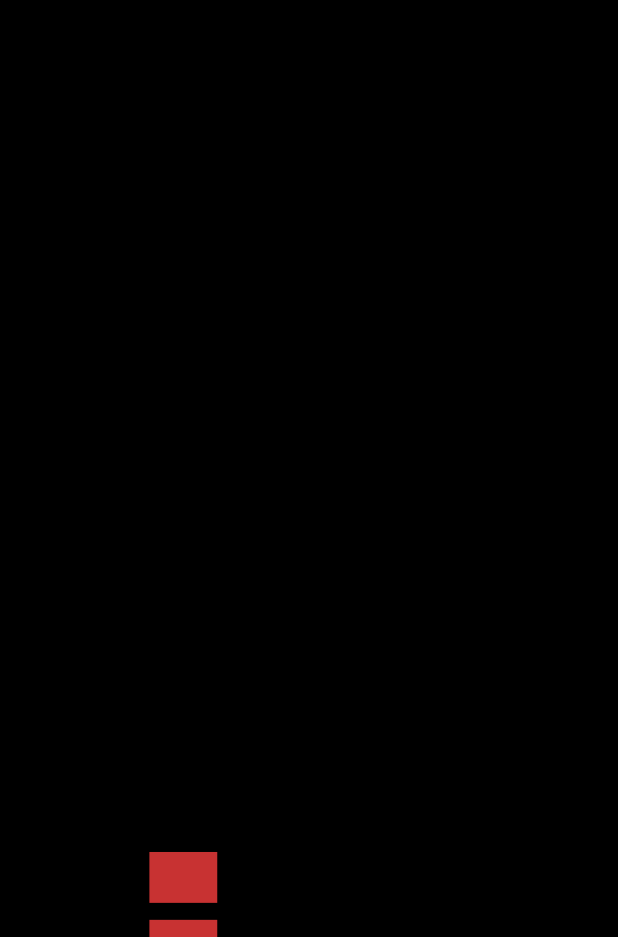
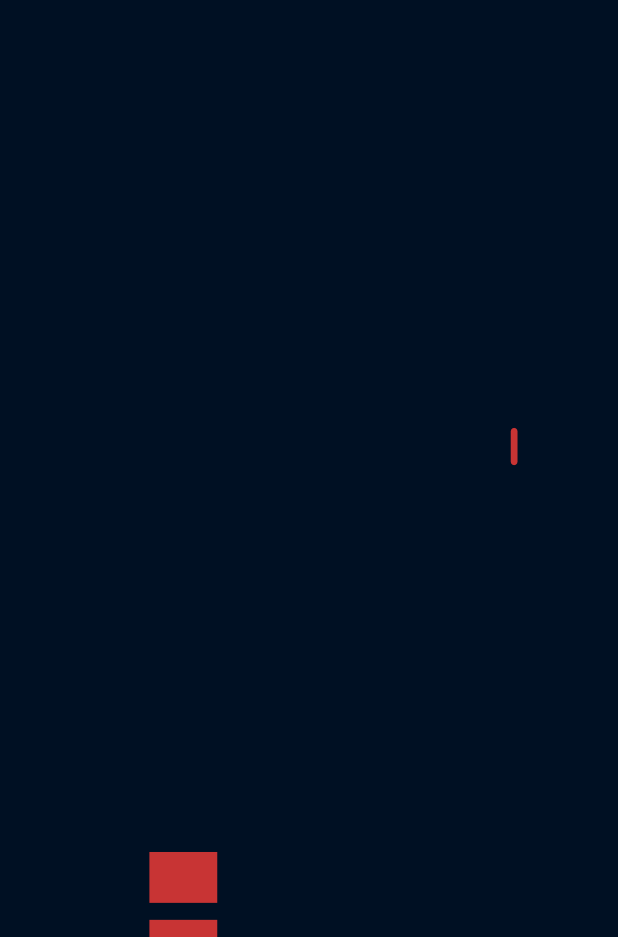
top track: none -> (514, 431) (514, 461)

